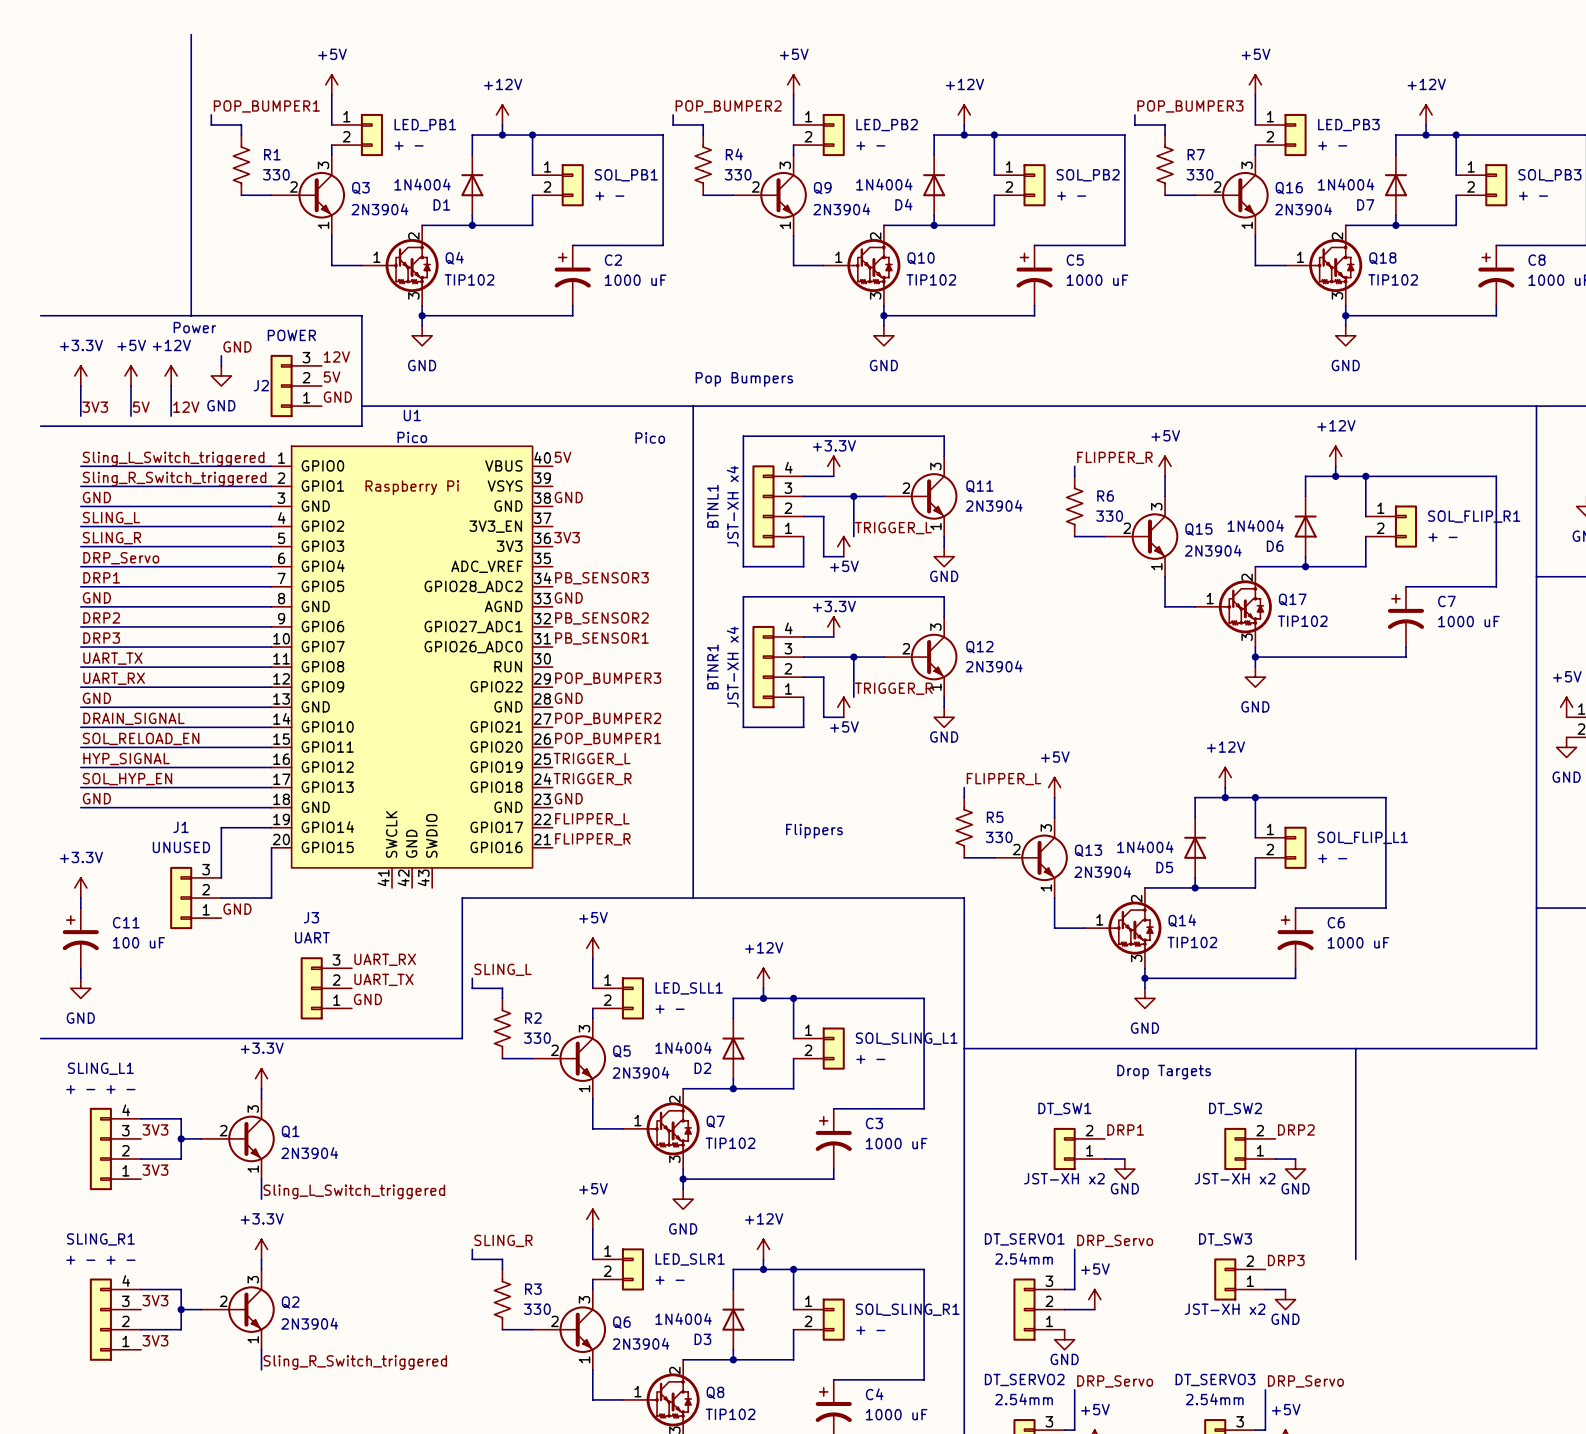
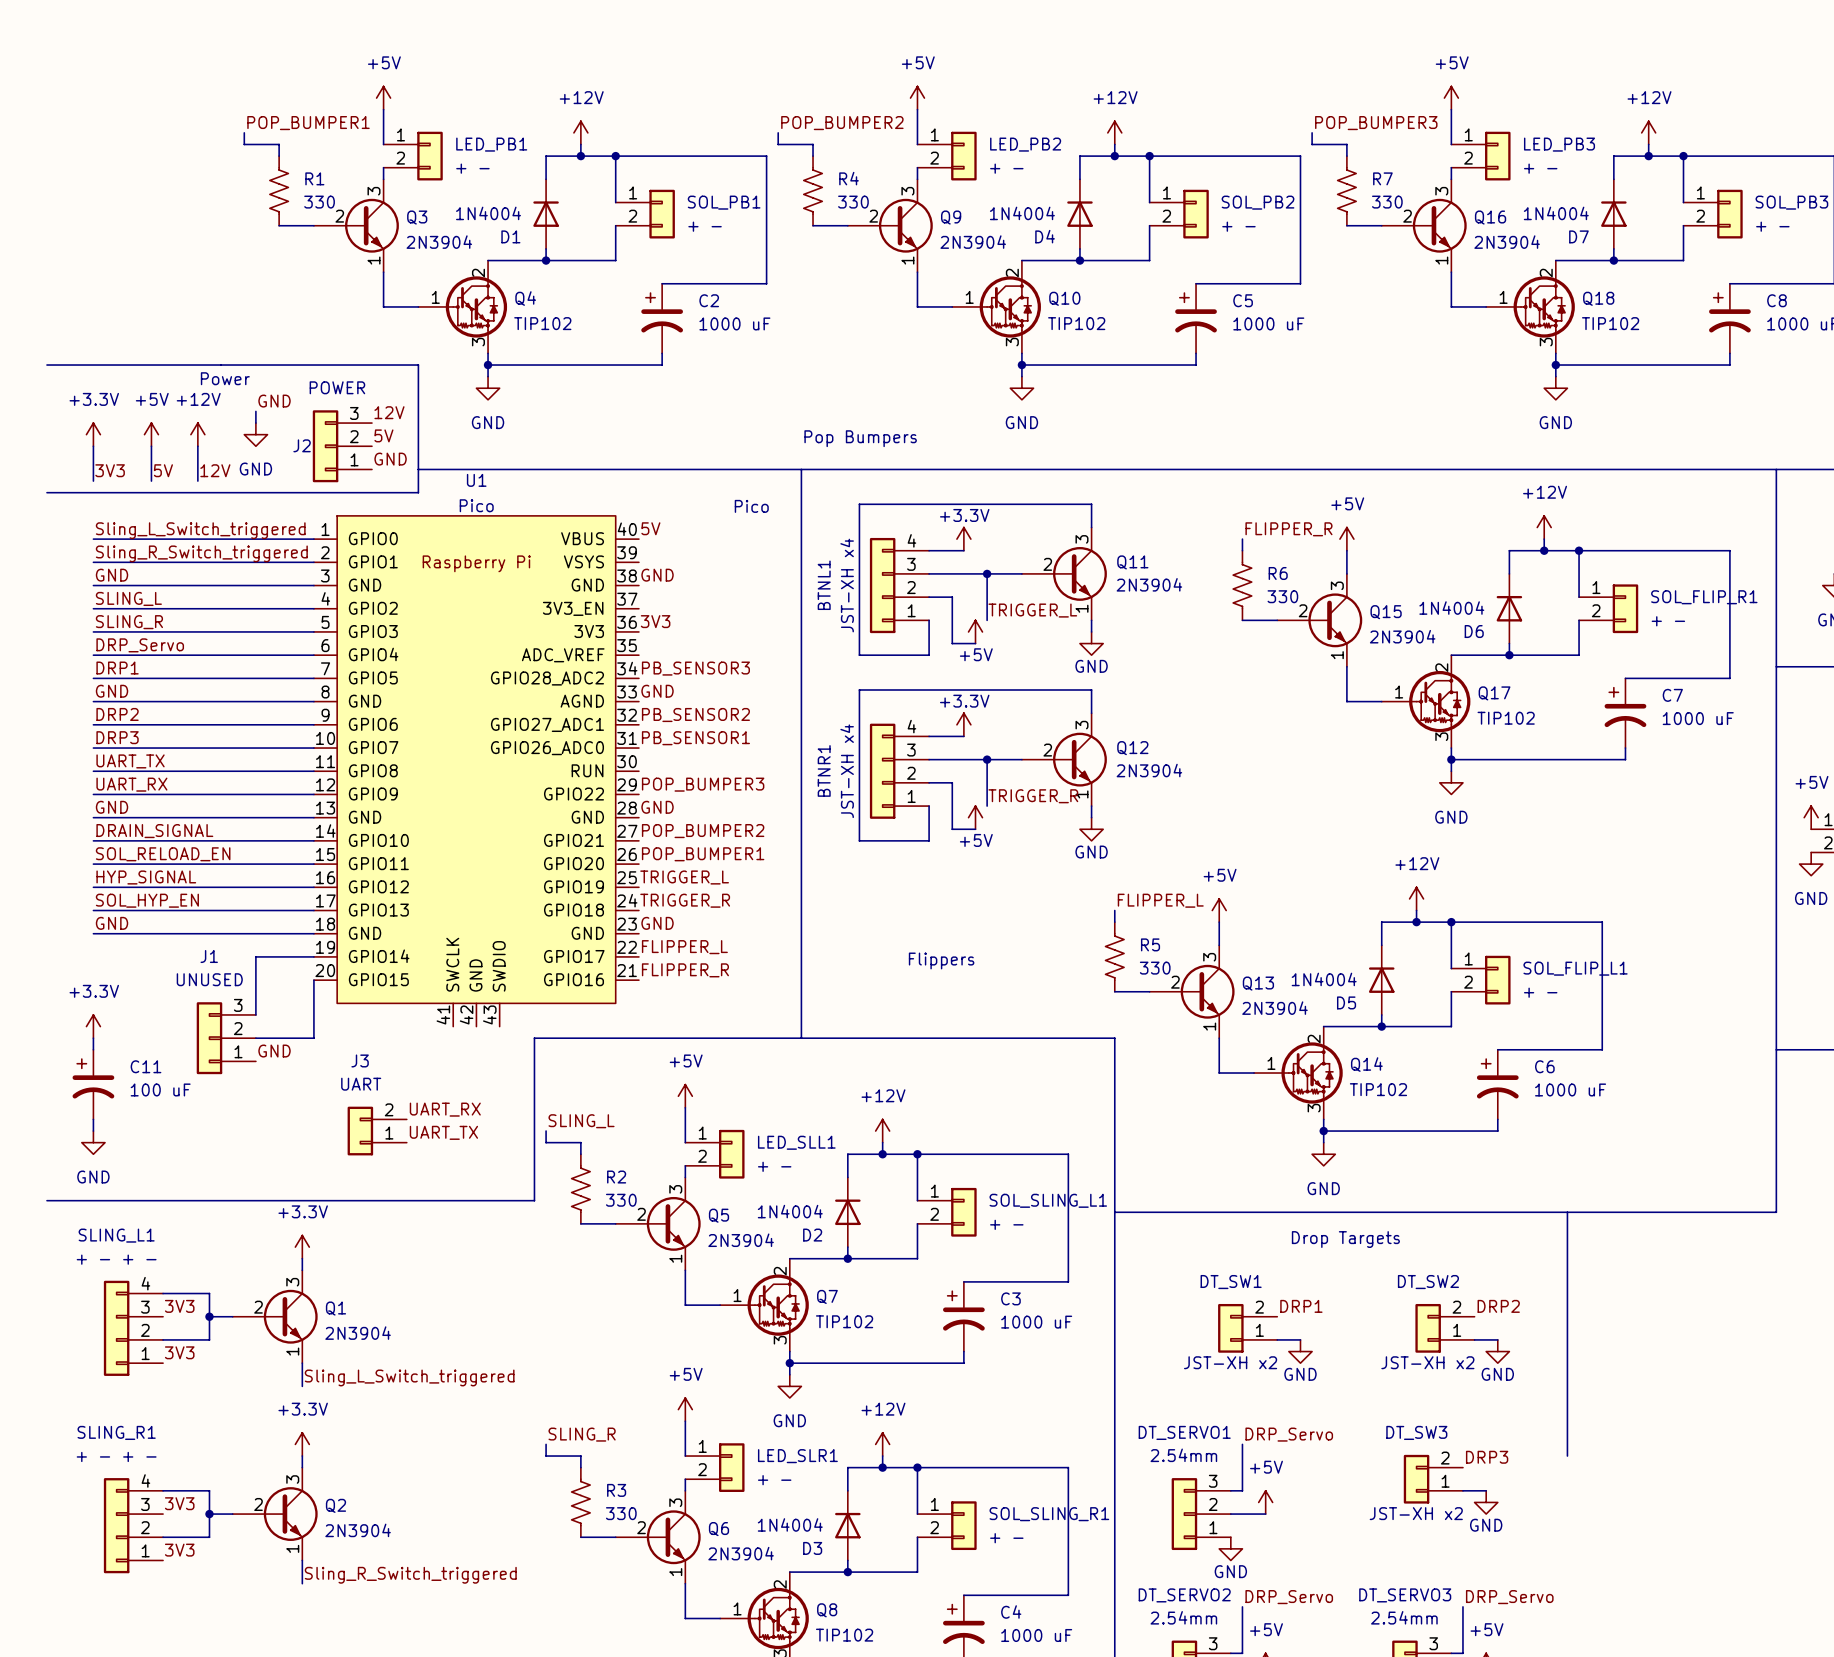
line: (191, 34) (191, 315) -> none
J3 symbol: [300, 957, 352, 1020] -> [347, 1106, 407, 1156]
label: GND (367, 999) -> none

